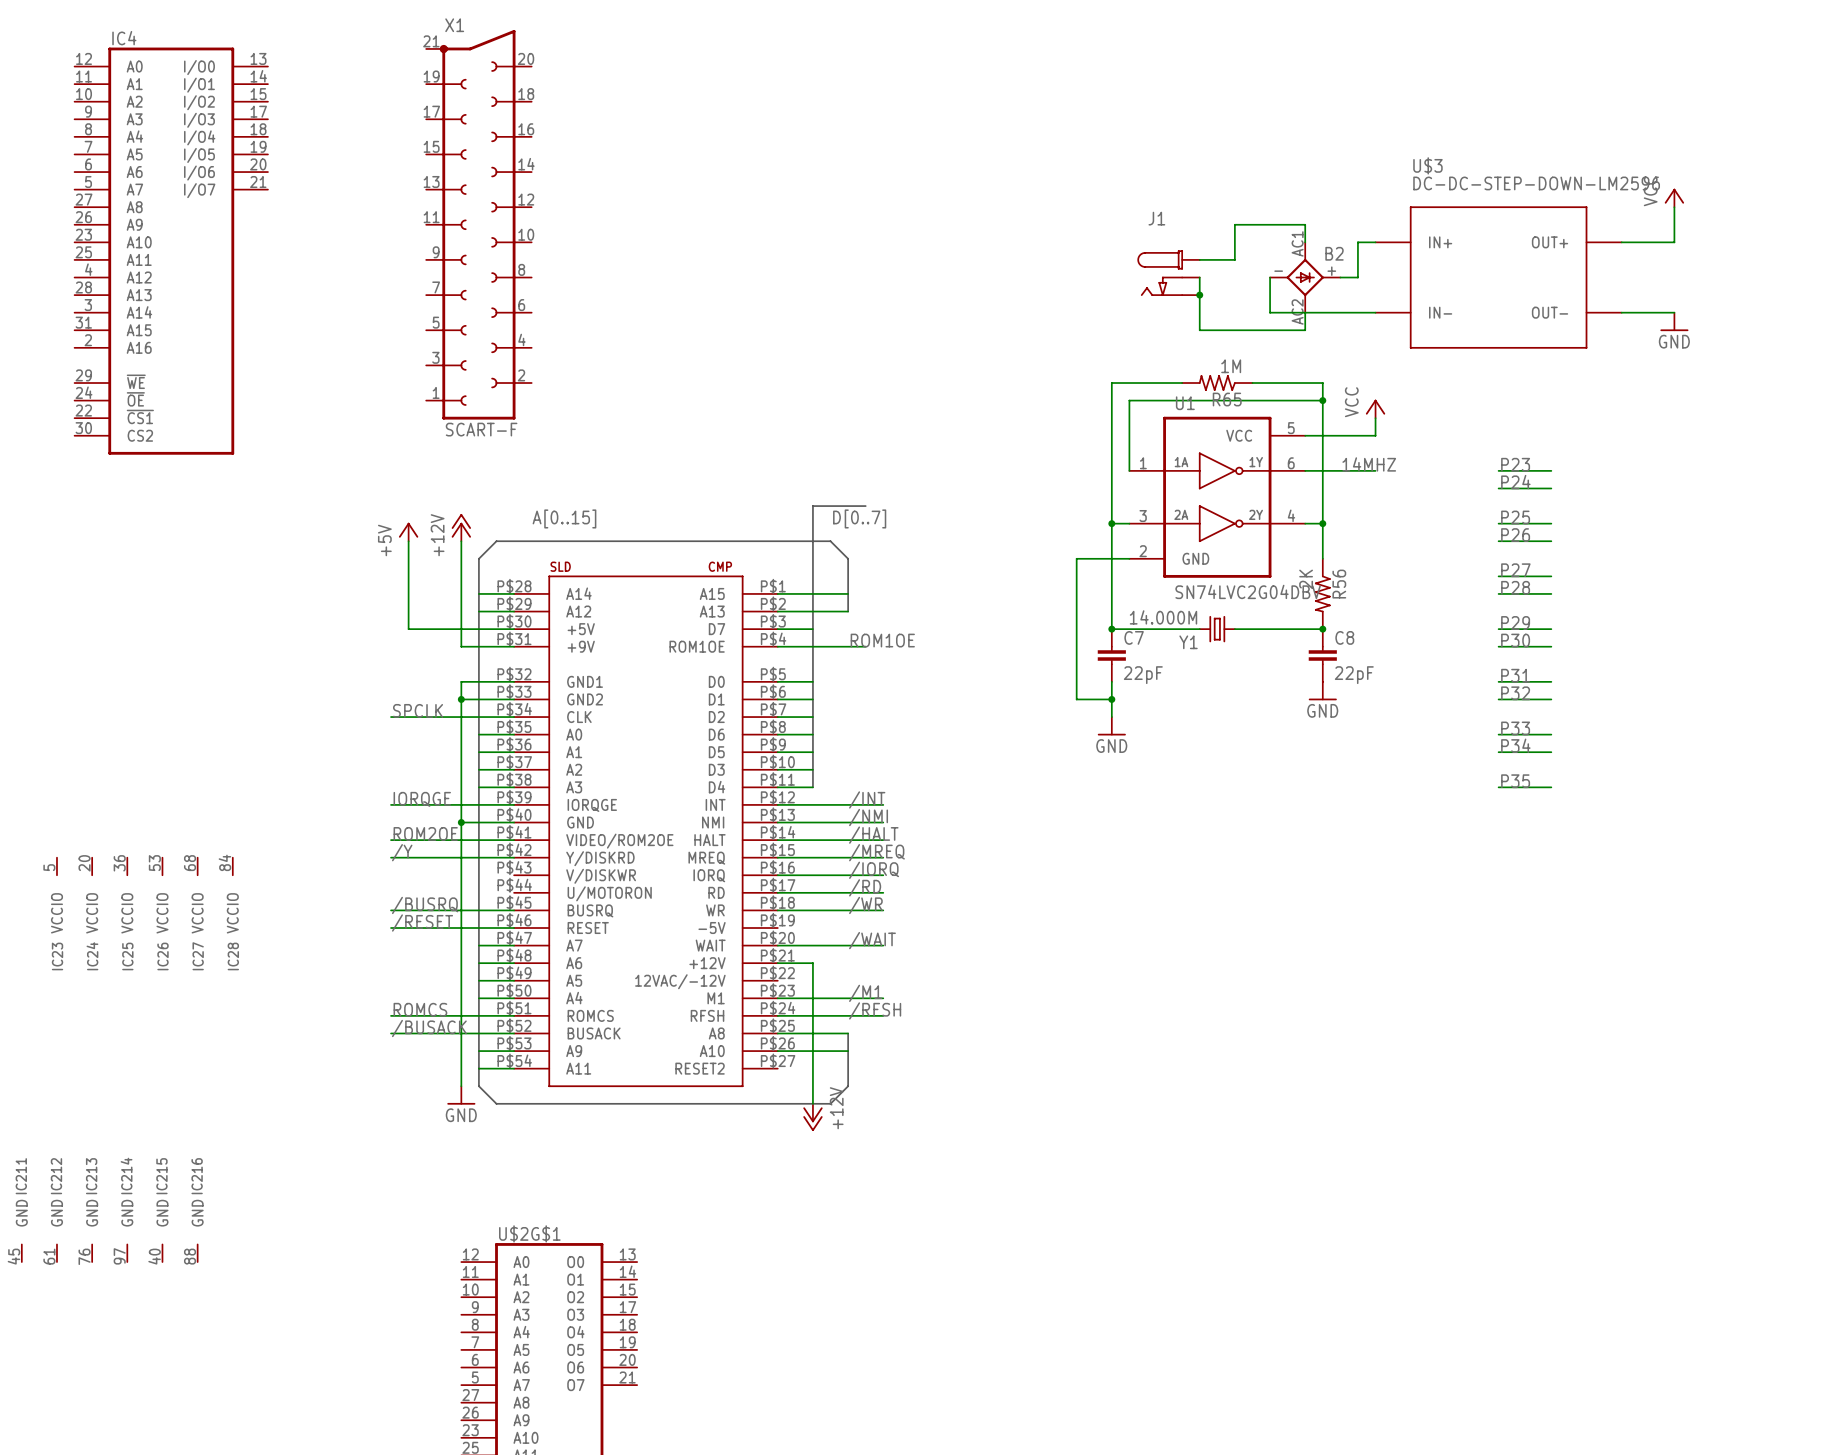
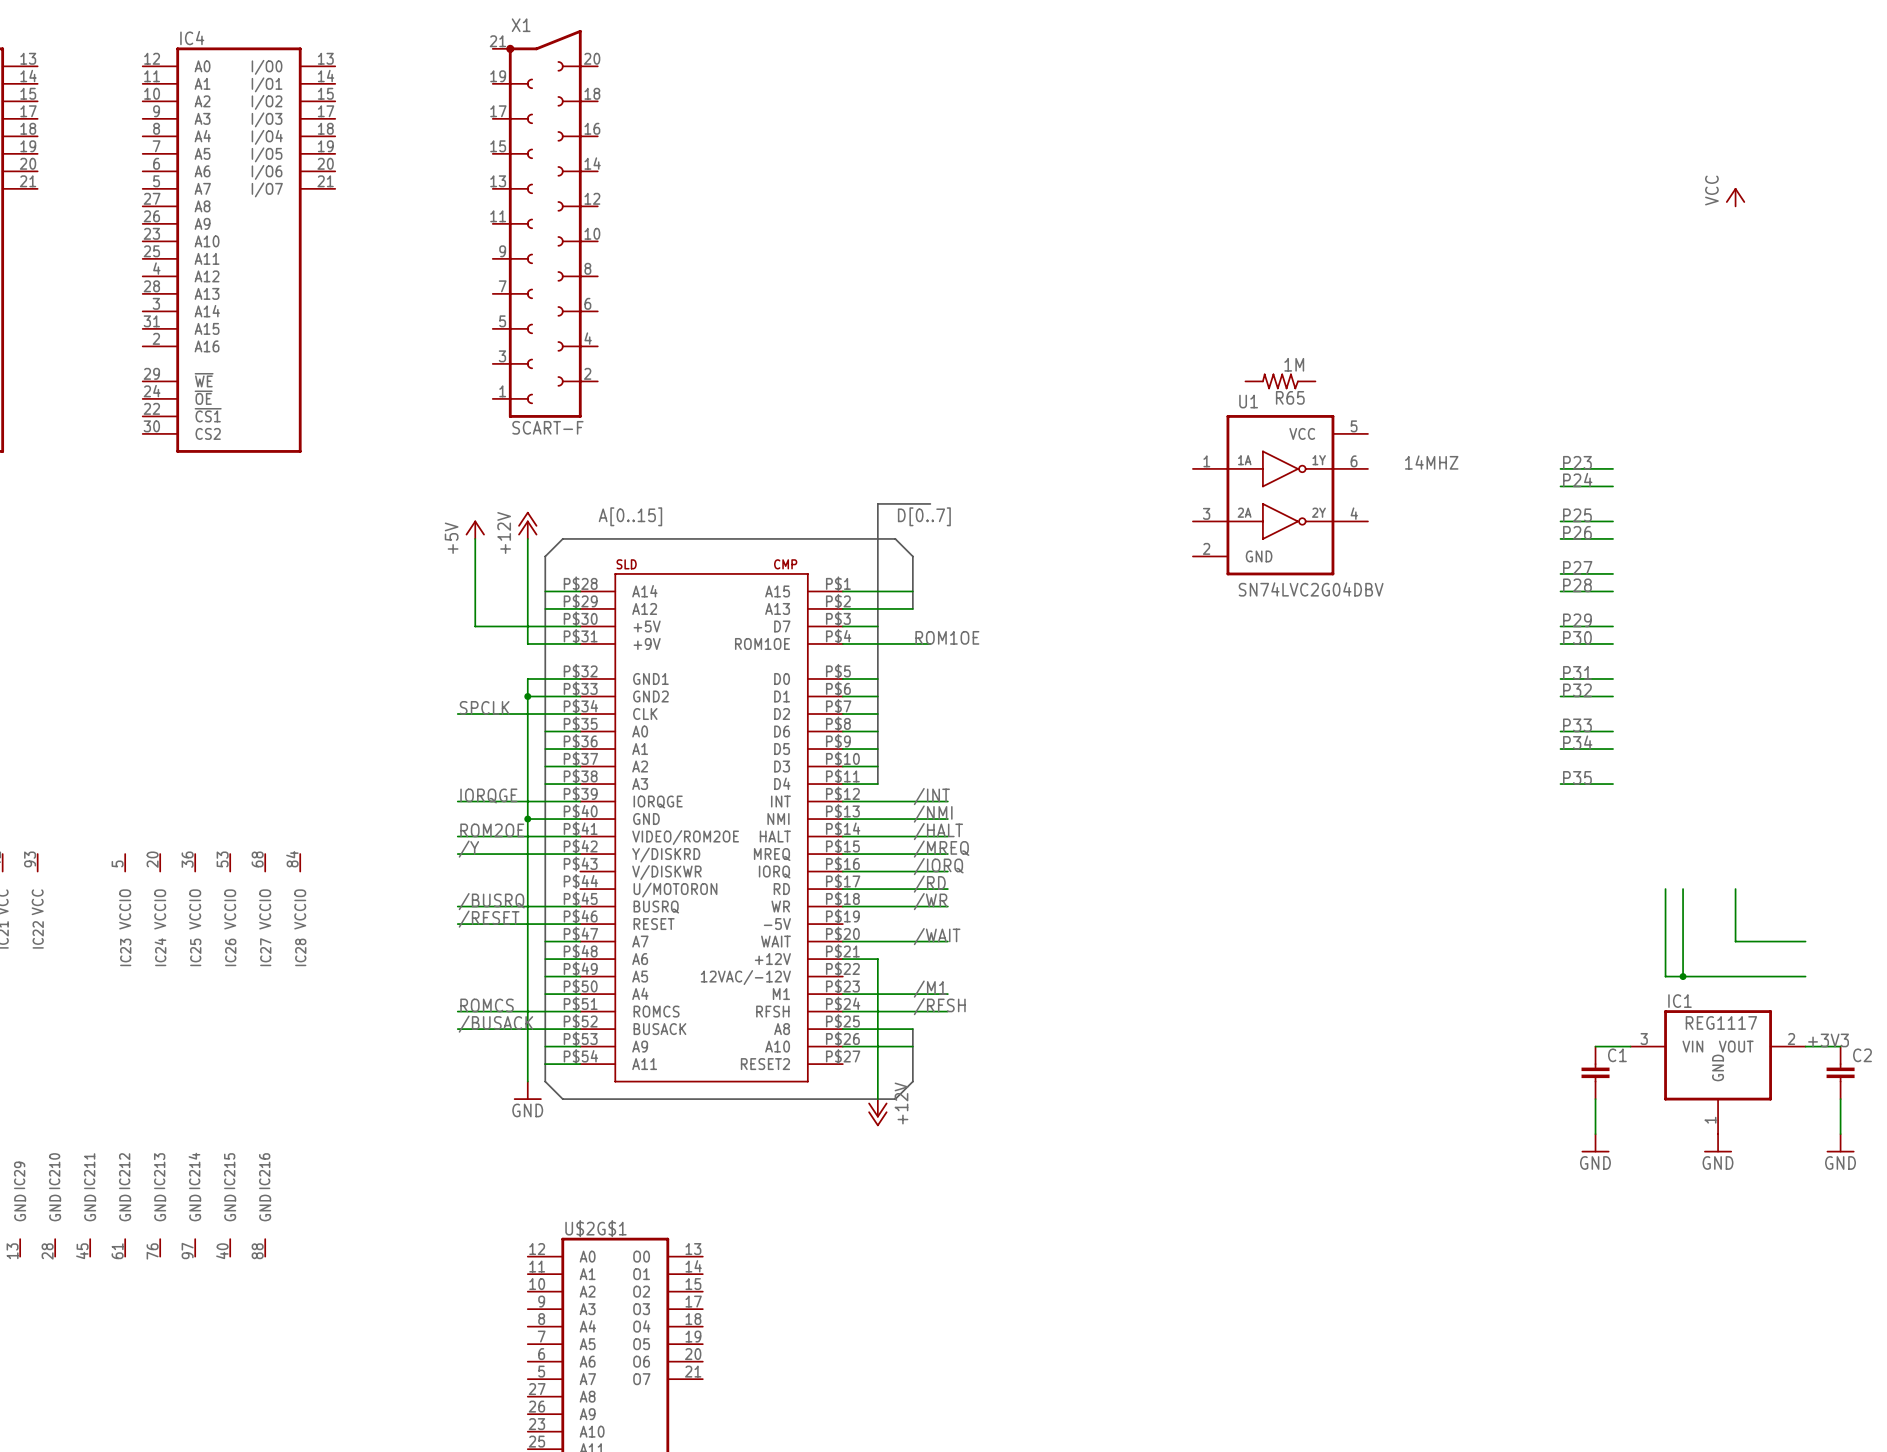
wire: (1674, 207) (1674, 242) (1621, 242) -> none
wire: (1305, 242) (1305, 224) (1234, 224) (1234, 259) (1199, 259) -> none
wire: (1375, 242) (1357, 242) (1357, 277) (1340, 277) -> none
J1: (1168, 273) -> none
wire: (1199, 277) (1199, 330) (1305, 330) (1305, 312) -> none
wire: (1270, 277) (1270, 312) (1375, 312) -> none
B2: (1305, 277) -> none
U$3: DC-DC-STEP-DOWN-LM2596 (1498, 277) -> none
junction: (1199, 295) -> none
wire: (1621, 312) (1674, 312) -> none
power symbol: GND (1674, 321) -> none
wire: (1182, 383) (1111, 383) (1111, 629) (1199, 629) -> none
wire: (1252, 383) (1322, 383) (1322, 558) -> none
wire: (1322, 400) (1129, 400) (1129, 470) -> none
junction: (1322, 400) -> none
power symbol: VCC (1375, 408) -> none
wire: (1375, 418) (1375, 435) (1305, 435) -> none
wire: (1305, 470) (1375, 470) -> none
wire: (1111, 523) (1129, 523) -> none
junction: (1111, 523) -> none
wire: (1305, 523) (1322, 523) -> none
junction: (1322, 523) -> none
wire: (1129, 558) (1076, 558) (1076, 699) (1111, 699) -> none
R56: 2K (1322, 593) -> none
junction: (1111, 629) -> none
Y1: 14.000M (1217, 629) -> none
wire: (1234, 629) (1322, 629) -> none
junction: (1322, 629) -> none
C7: 22pF (1111, 655) -> none
C8: 22pF (1322, 655) -> none
wire: (1111, 681) (1111, 717) -> none
power symbol: GND (1322, 691) -> none
junction: (1111, 699) -> none
power symbol: GND (1111, 726) -> none
wire: none -> (1665, 889) (1665, 976) (1805, 976)
wire: none -> (1683, 889) (1683, 976)
wire: none -> (1735, 889) (1735, 941) (1805, 941)
junction: none -> (1683, 976)
label: none -> +3V3 (1828, 1040)
wire: none -> (1595, 1046) (1630, 1046)
wire: none -> (1805, 1046) (1840, 1046)
IC1: none -> REG1117 (1718, 1072)
C1: none -> (1595, 1072)
C2: none -> (1840, 1072)
wire: none -> (1595, 1099) (1595, 1134)
wire: none -> (1840, 1099) (1840, 1134)
power symbol: none -> GND (1595, 1143)
power symbol: none -> GND (1718, 1143)
power symbol: none -> GND (1840, 1143)

